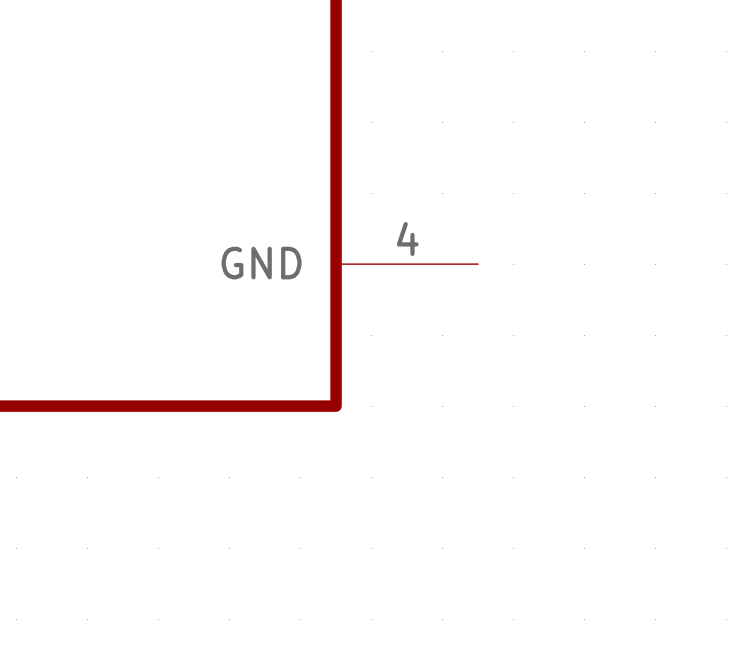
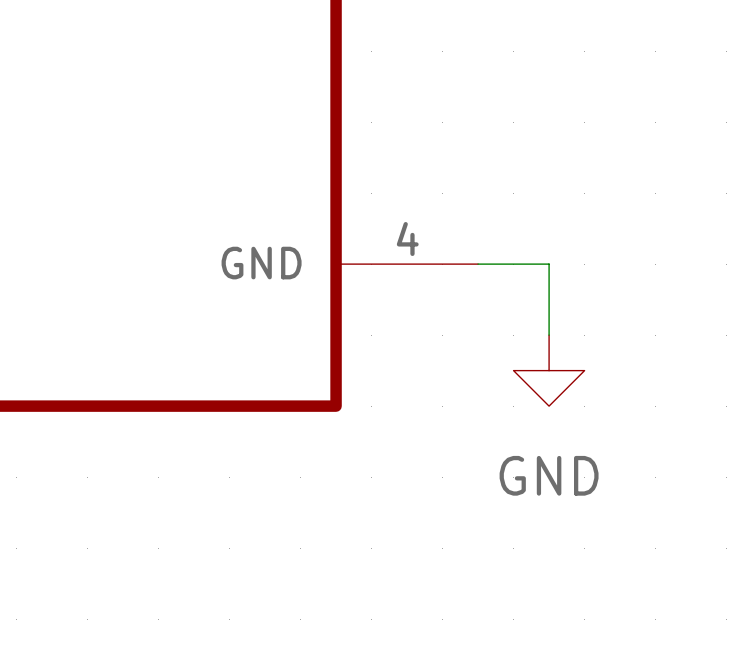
wire: none -> (478, 264) (549, 264) (549, 335)
power symbol: none -> GND (549, 370)

